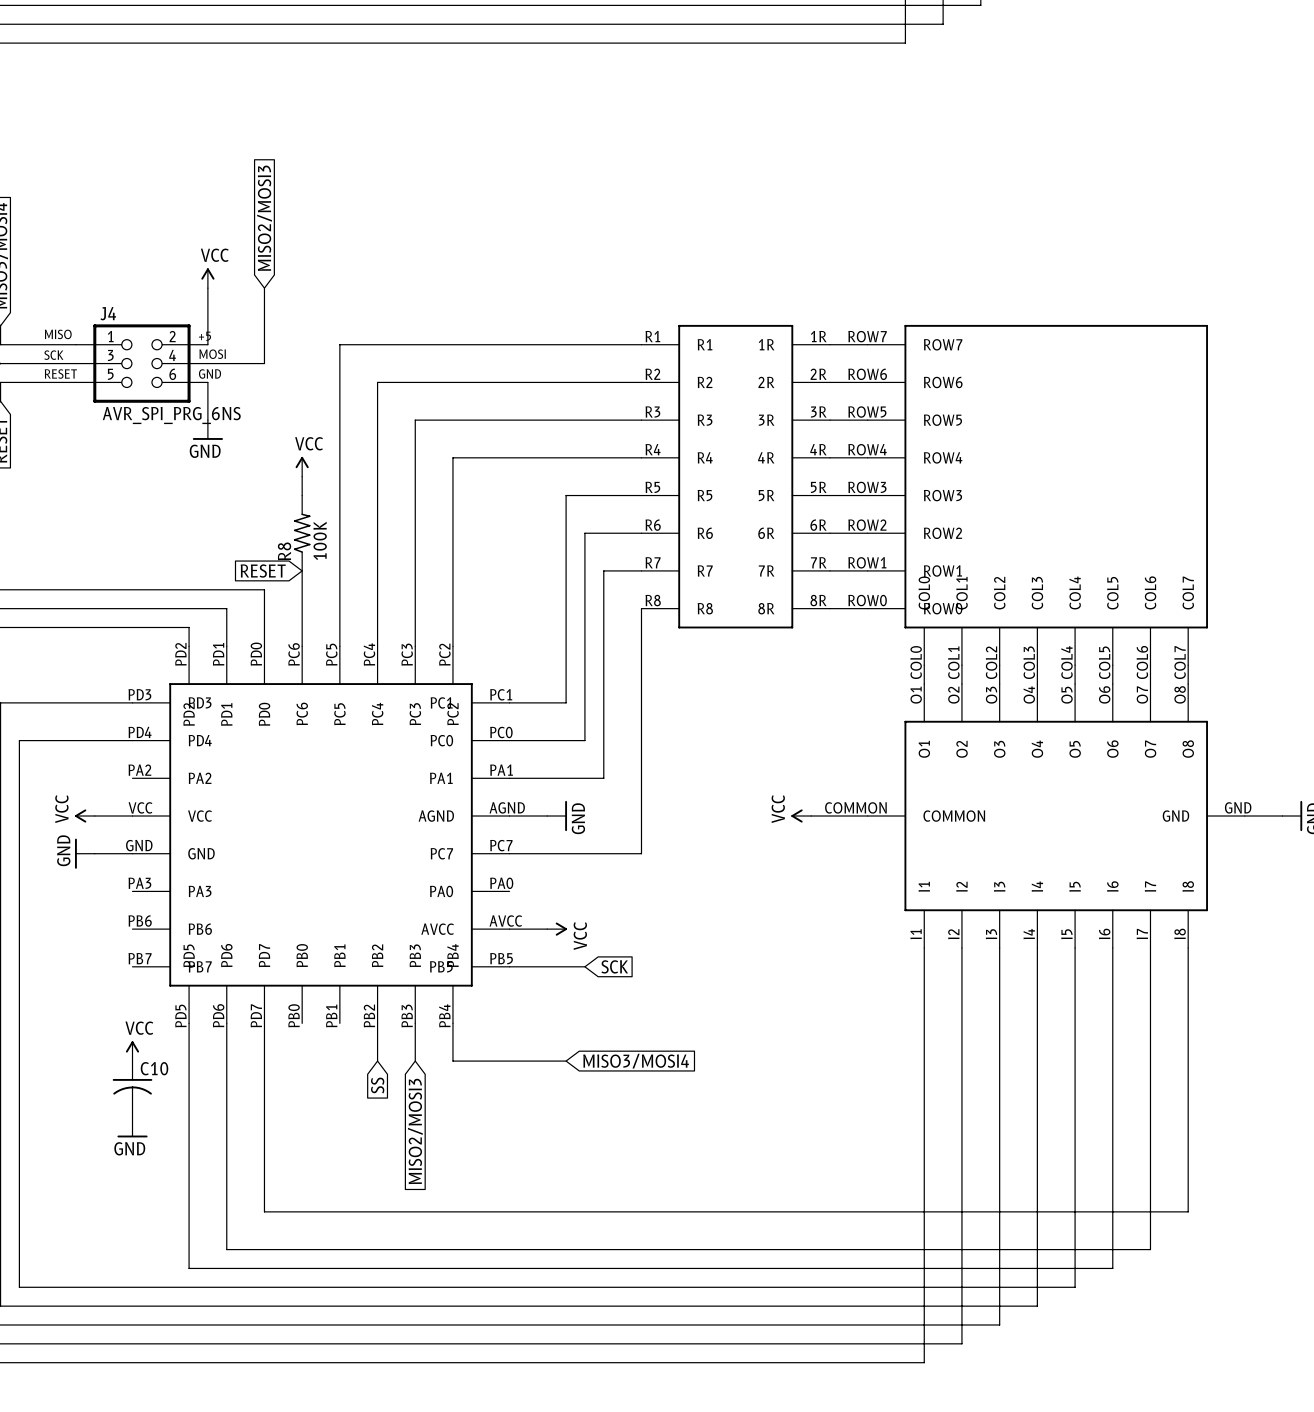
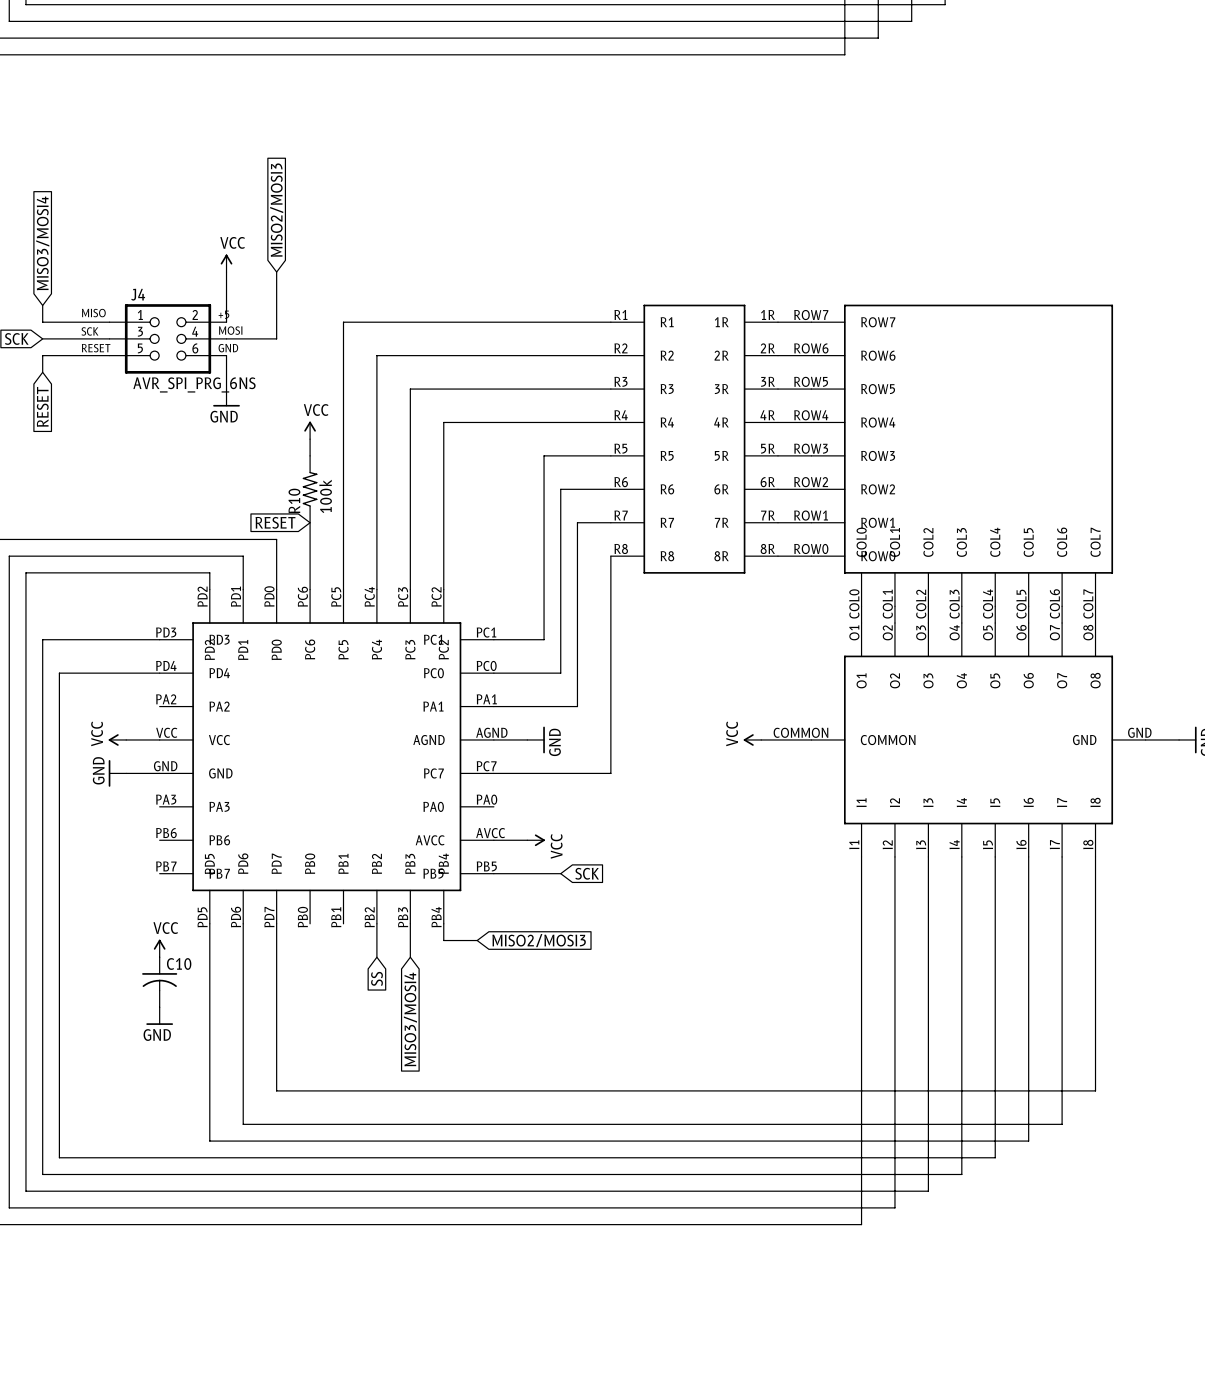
R8 value: 100K (320, 540) -> 100k (325, 496)
R8 name: R8 (284, 551) -> R10 (294, 500)
wire: (452, 1042) (452, 1061) (566, 1061) -> (443, 940) (477, 940)
global label: MISO3/MOSI4 (636, 1061) -> MISO2/MOSI3 (539, 940)
global label: MISO2/MOSI3 (415, 1131) -> MISO3/MOSI4 (410, 1019)

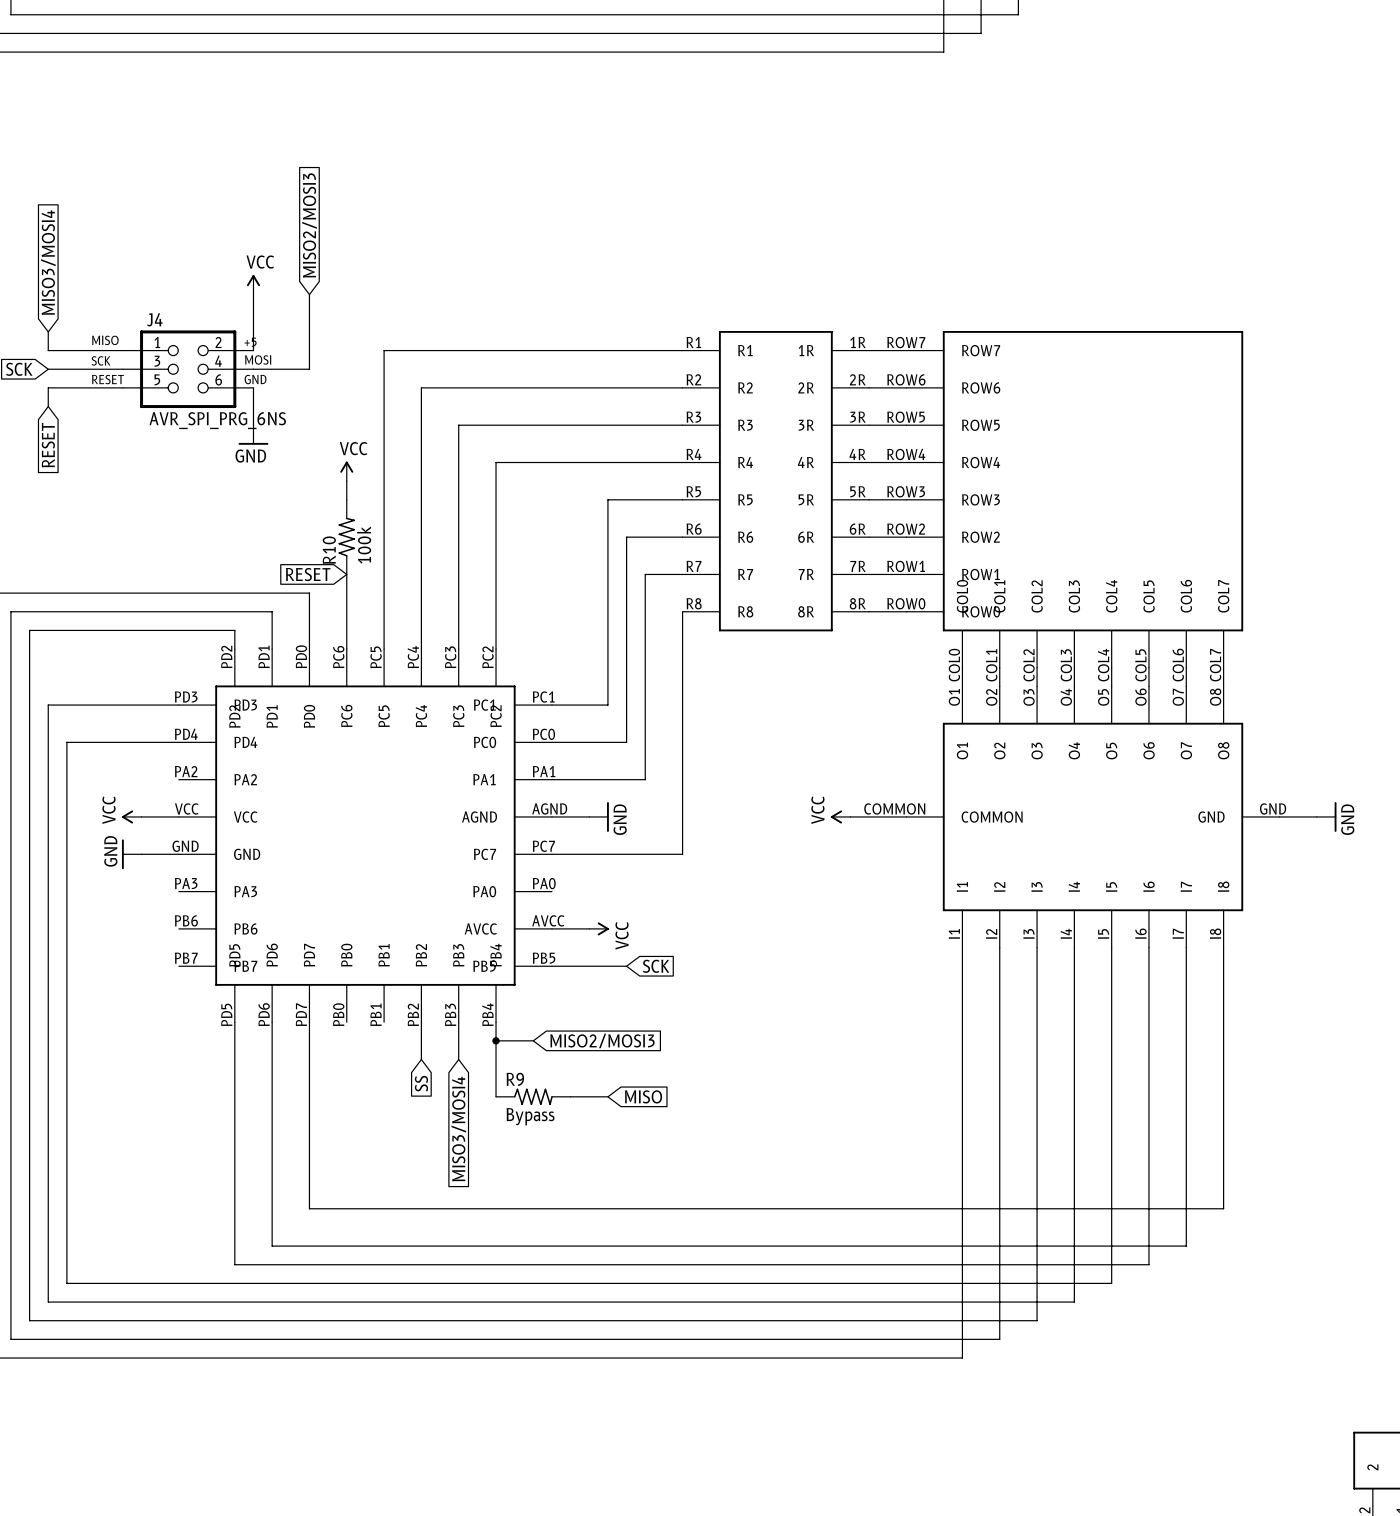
wire: none -> (496, 1040) (496, 1096)
junction: none -> (496, 1040)
power symbol: VCC (159, 948) -> none
C10: (159, 982) -> none
R9: none -> Bypass (533, 1096)
wire: none -> (570, 1096) (607, 1096)
global label: none -> MISO (643, 1096)
power symbol: GND (159, 1016) -> none

